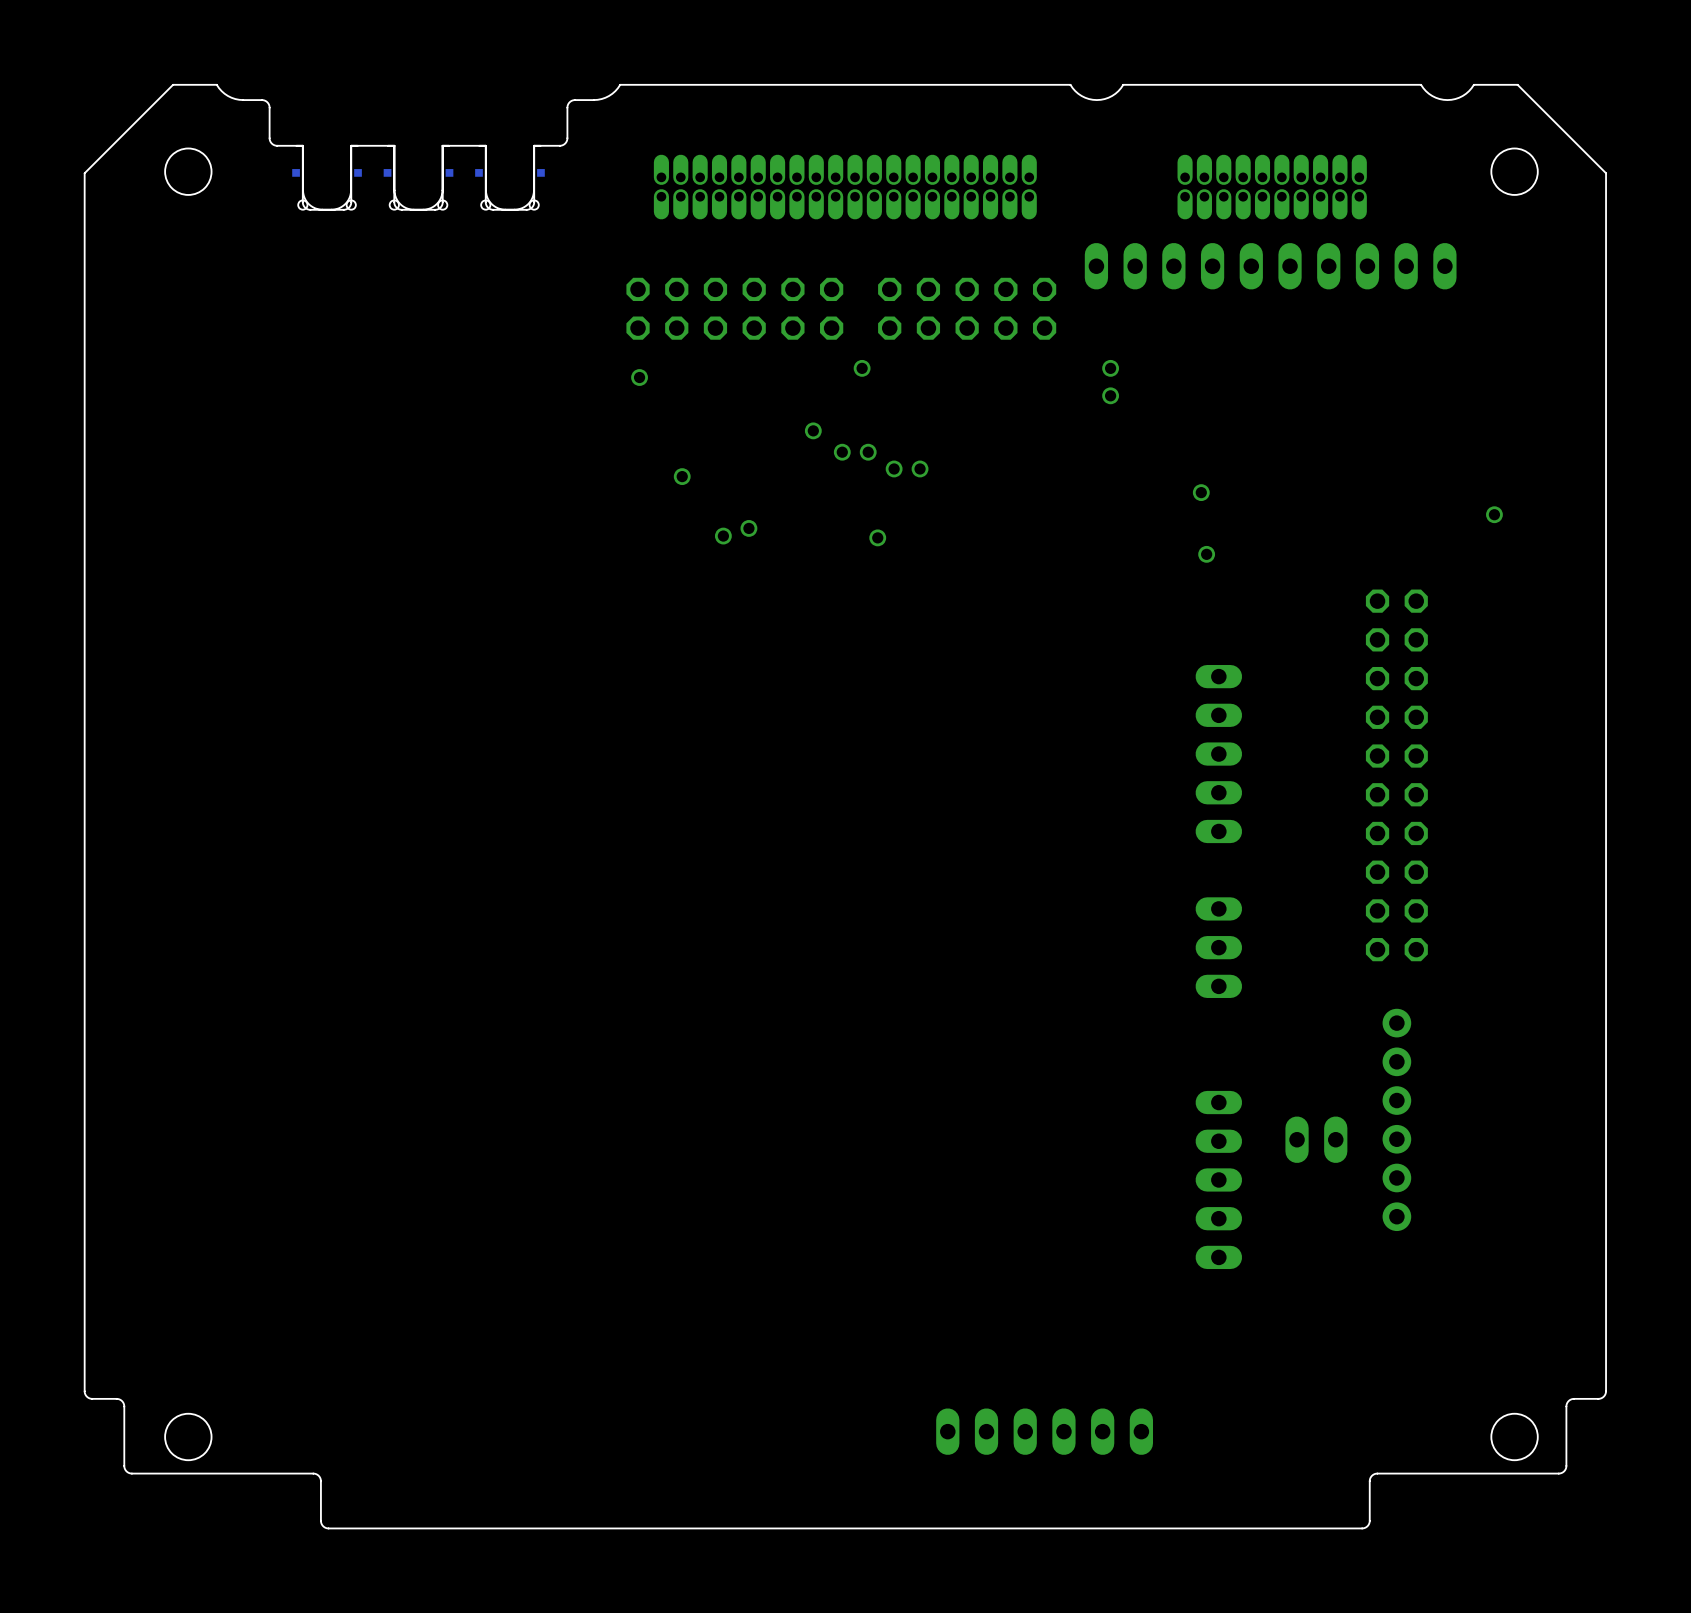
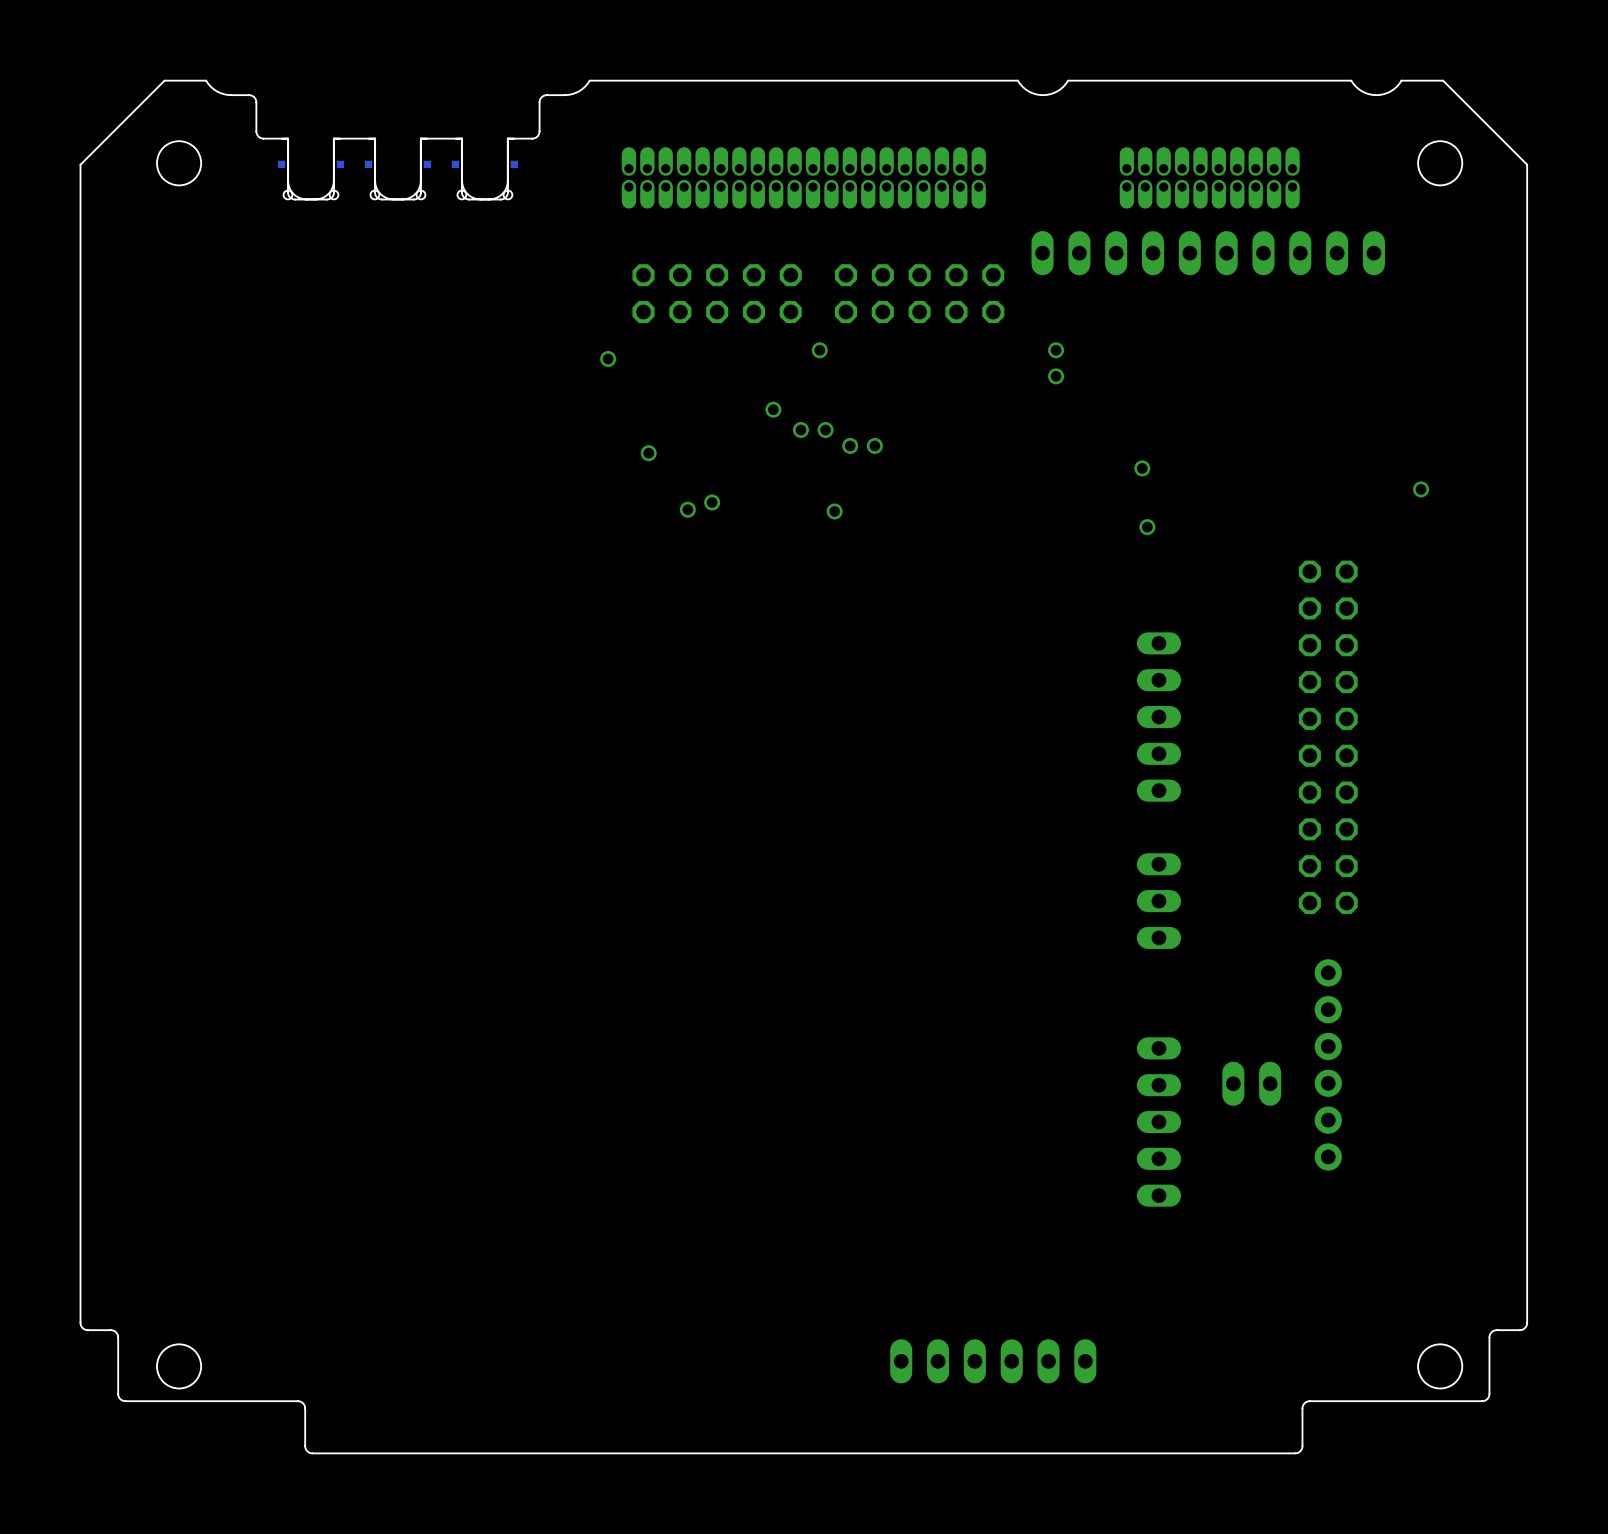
part: (734, 308) -> none

